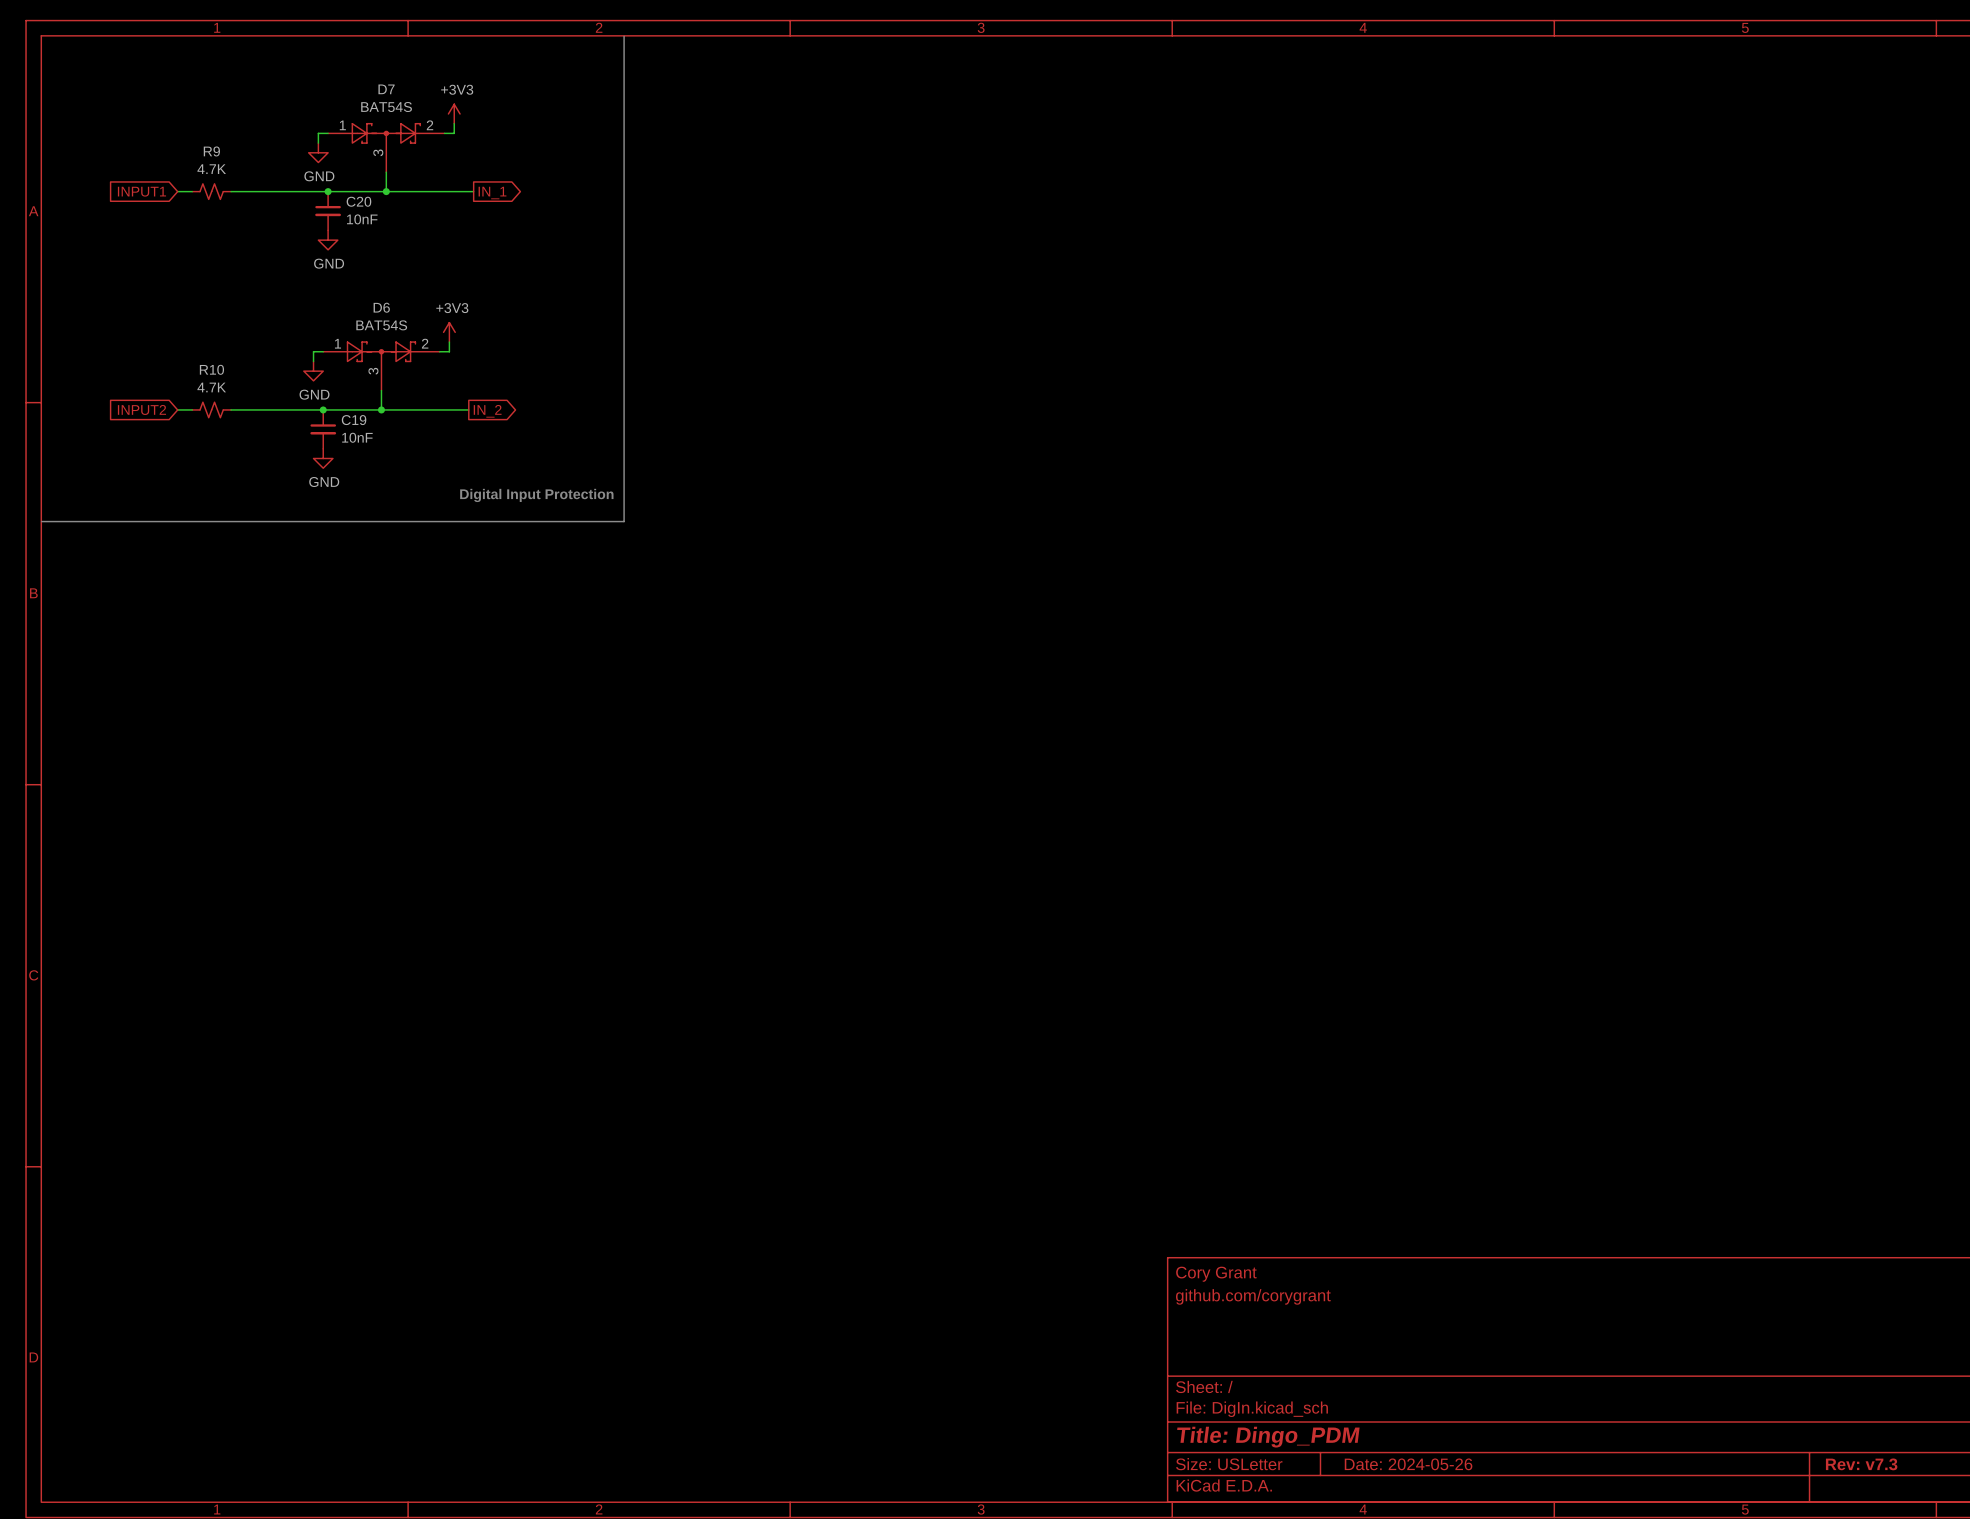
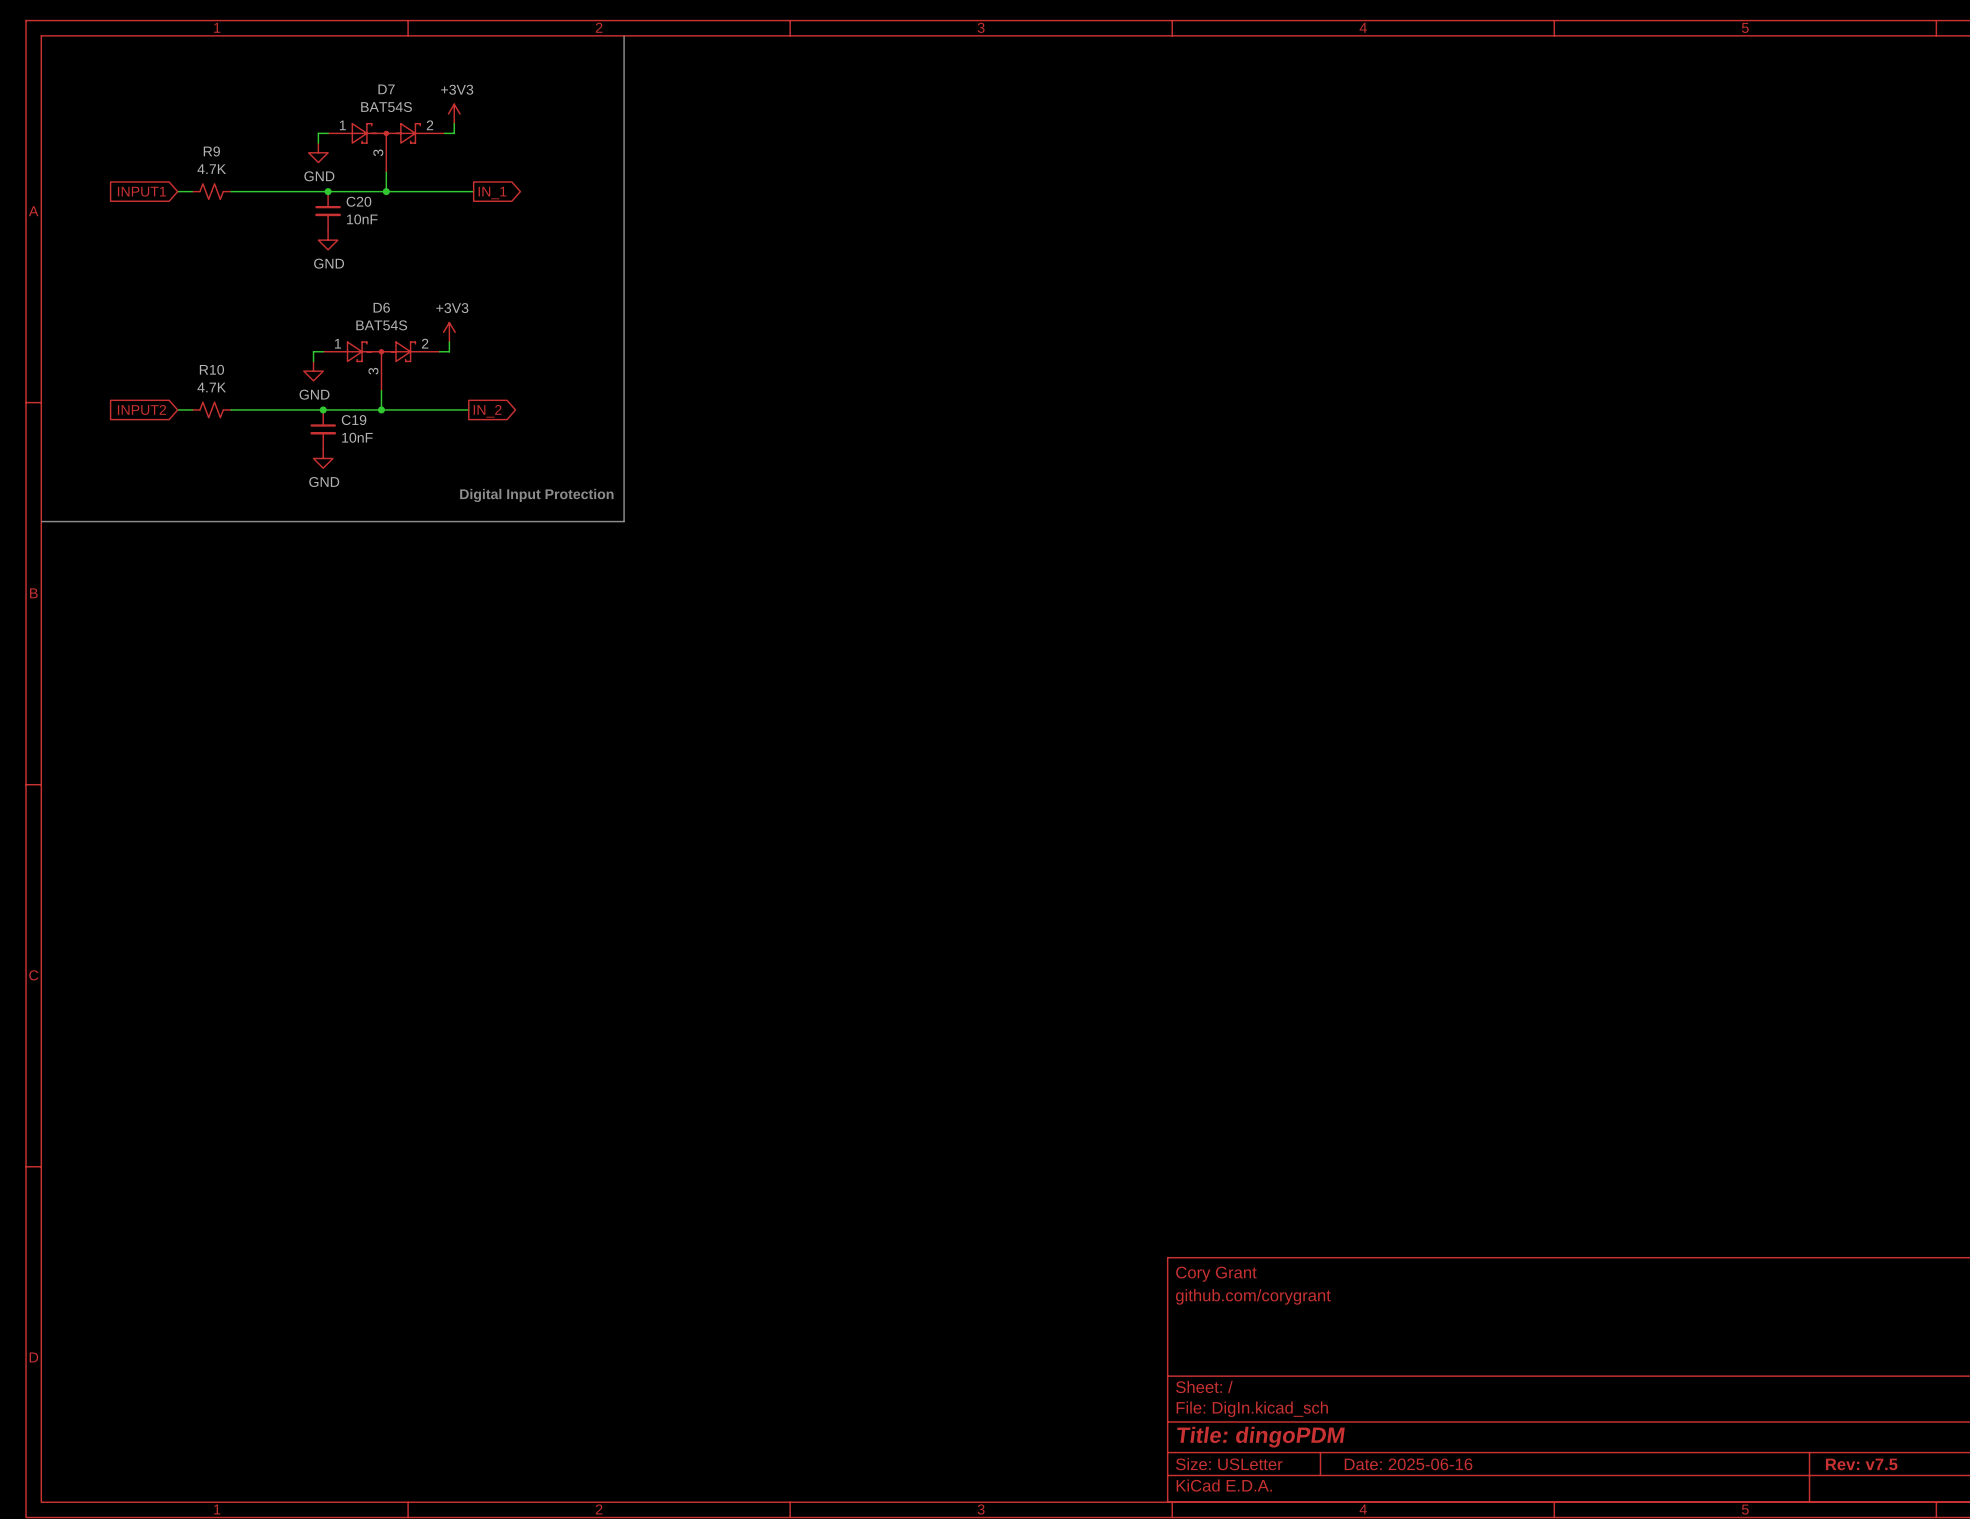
title block: Title: Dingo_PDM (1268, 1437) -> Title: dingoPDM (1260, 1437)
title block: Date: 2024-05-26 (1408, 1464) -> Date: 2025-06-16 (1408, 1464)
title block: Rev: v7.3 (1861, 1464) -> Rev: v7.5 (1861, 1464)

